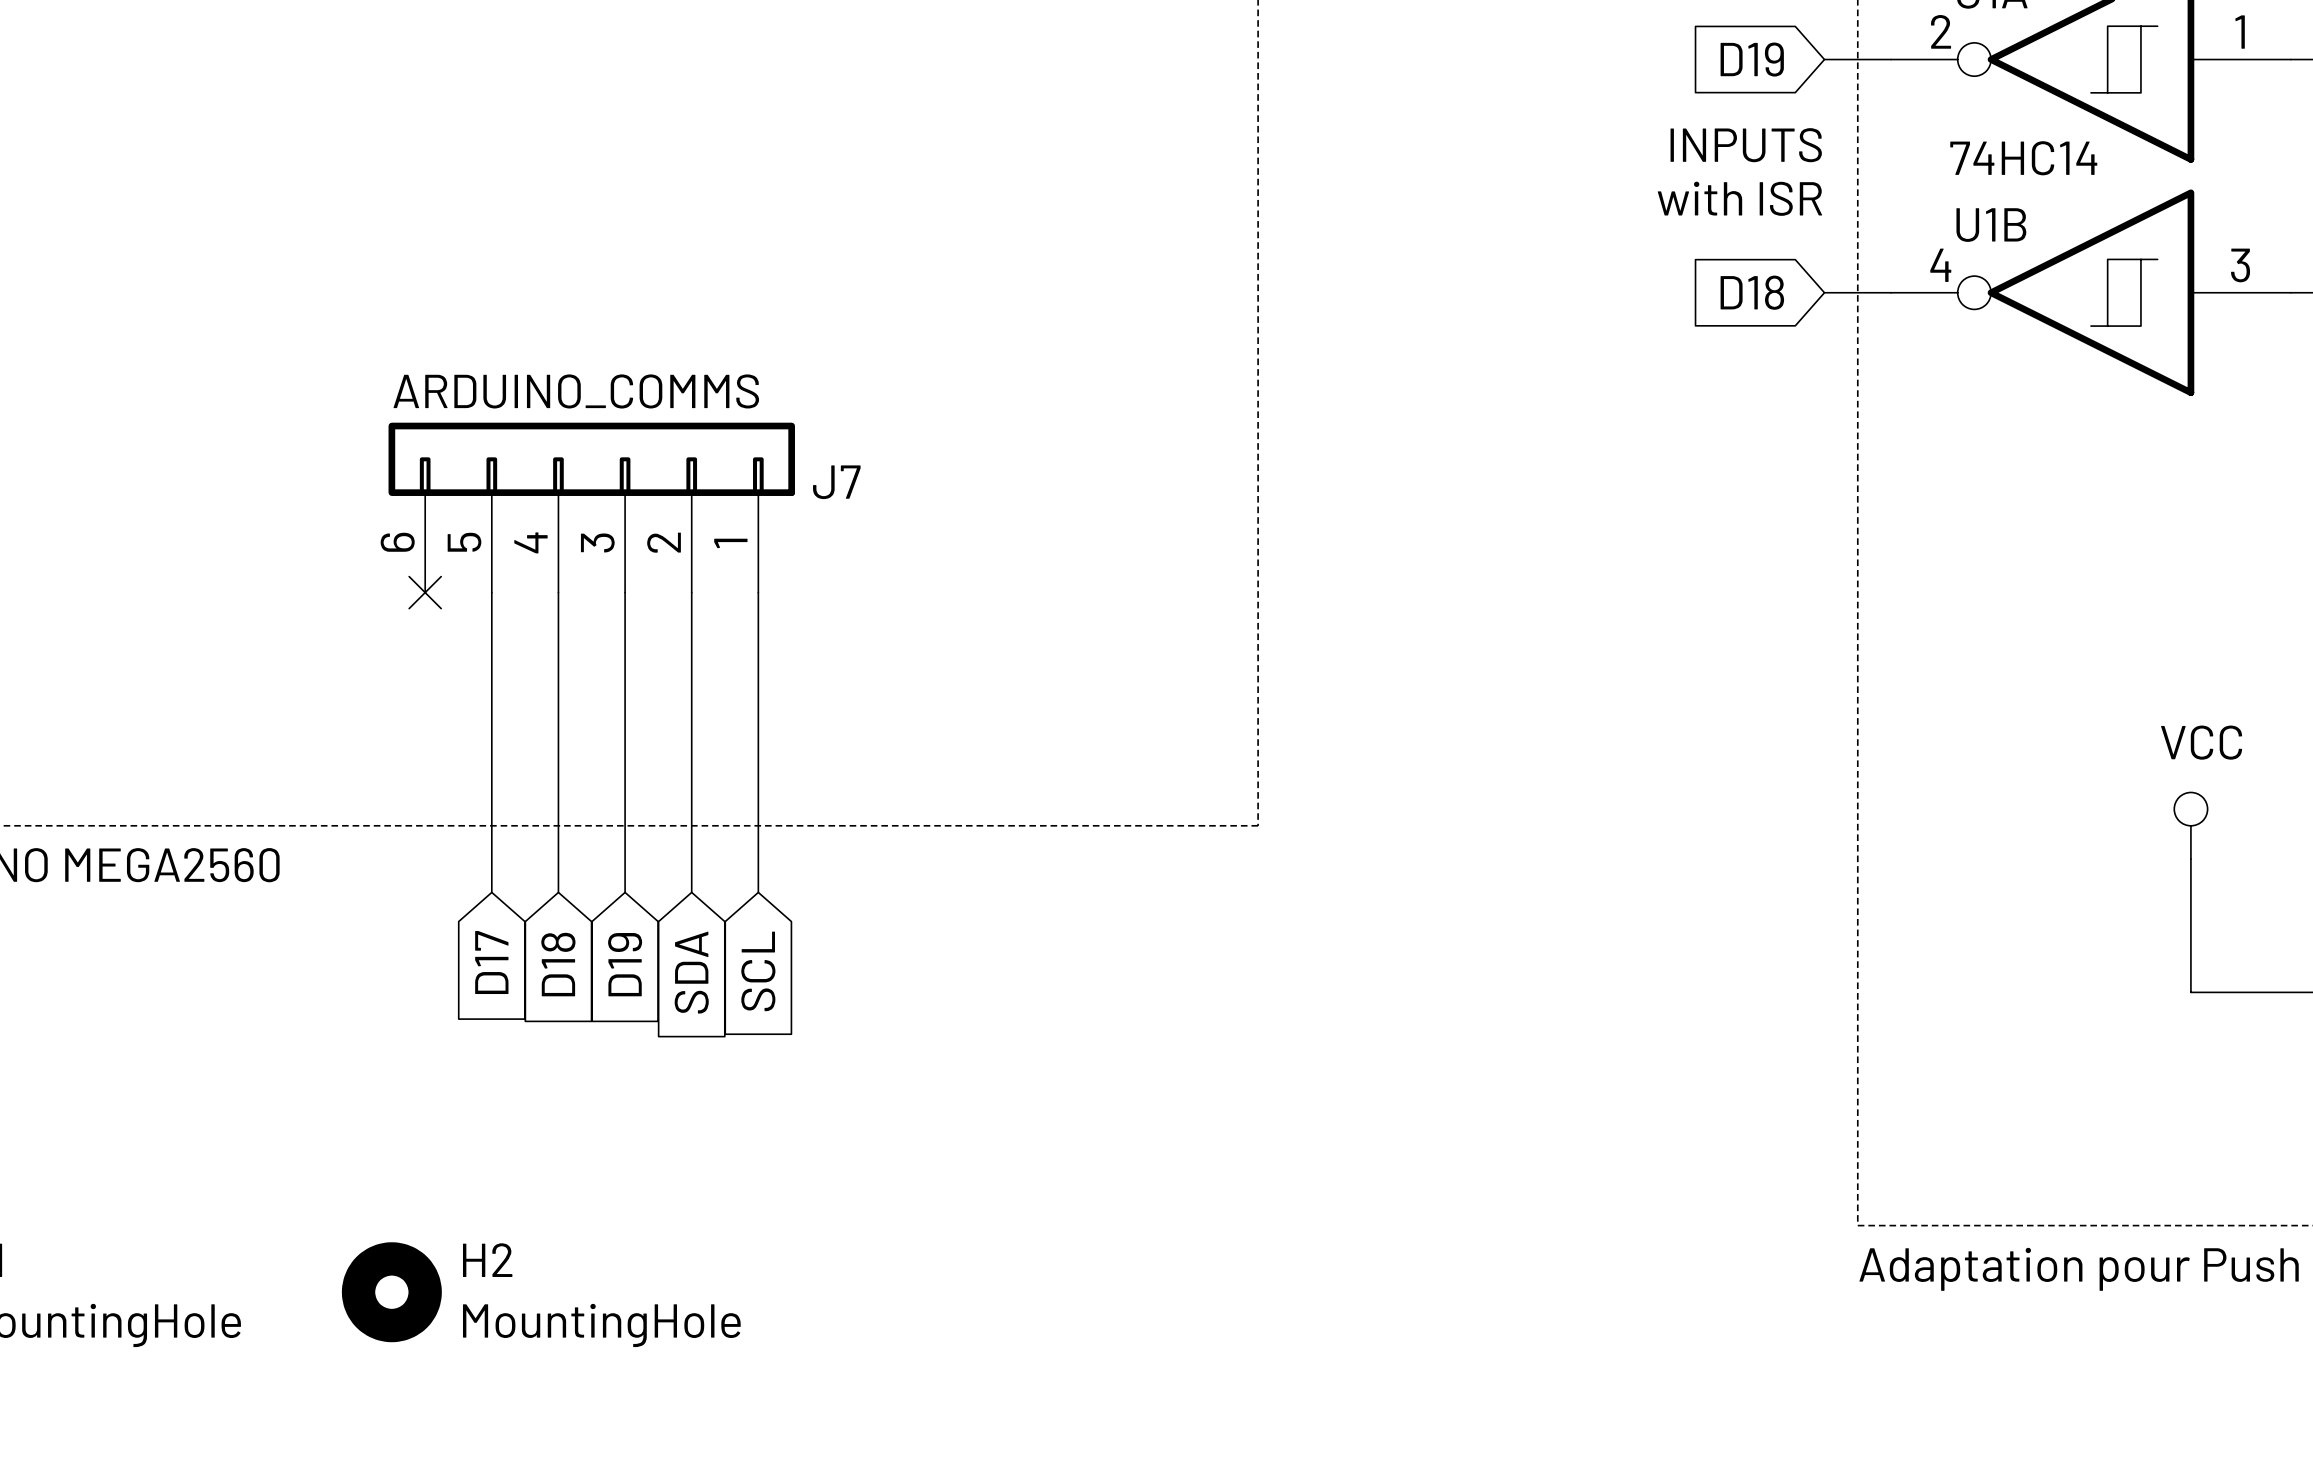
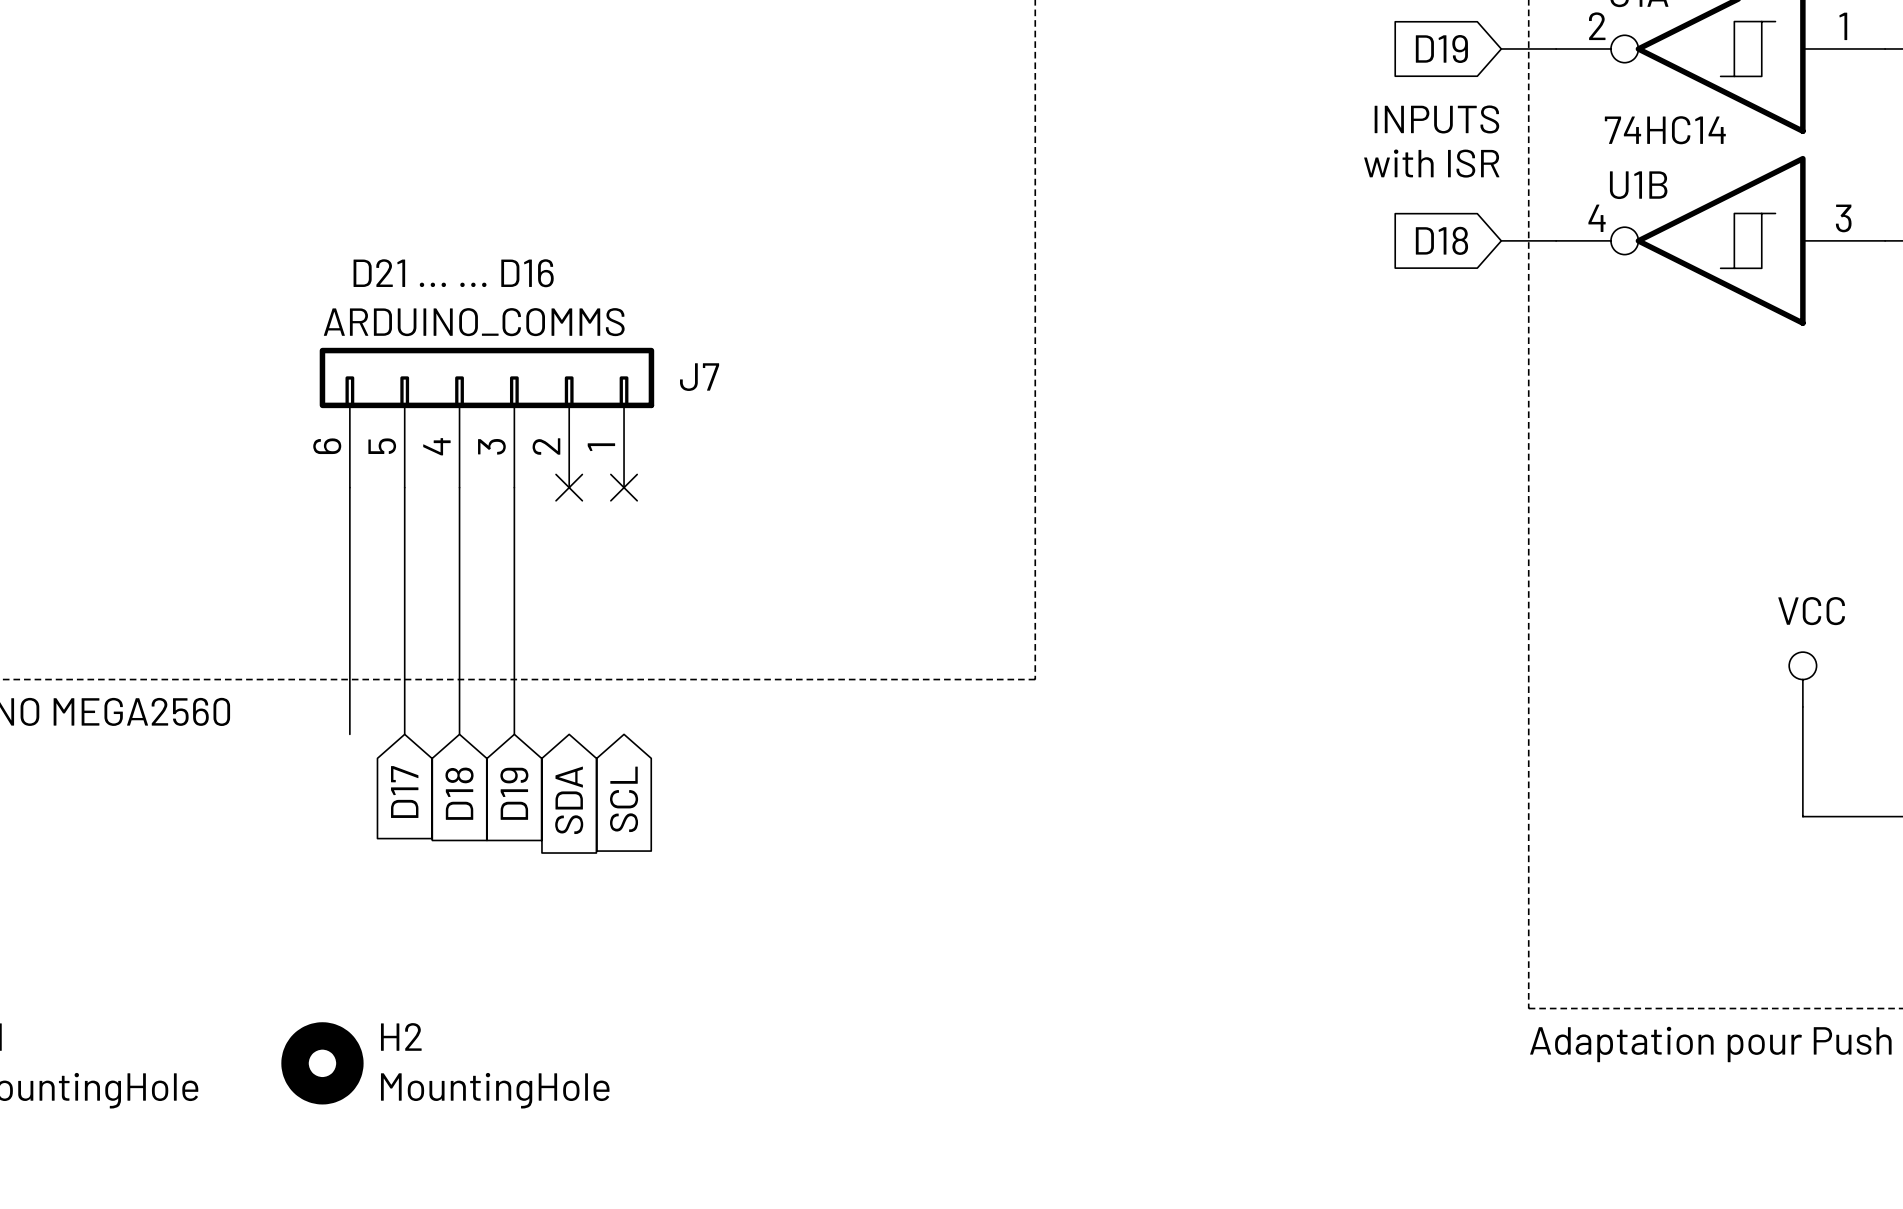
text: none -> D21 ... ... D16 (453, 273)
J7 name position: J7 (836, 482) -> J7 (699, 377)
no-connect mark: (425, 592) -> none
wire: (691, 592) (691, 892) -> (349, 487) (349, 734)
no-connect mark: none -> (569, 487)
wire: (758, 592) (758, 892) -> none
no-connect mark: none -> (624, 487)

